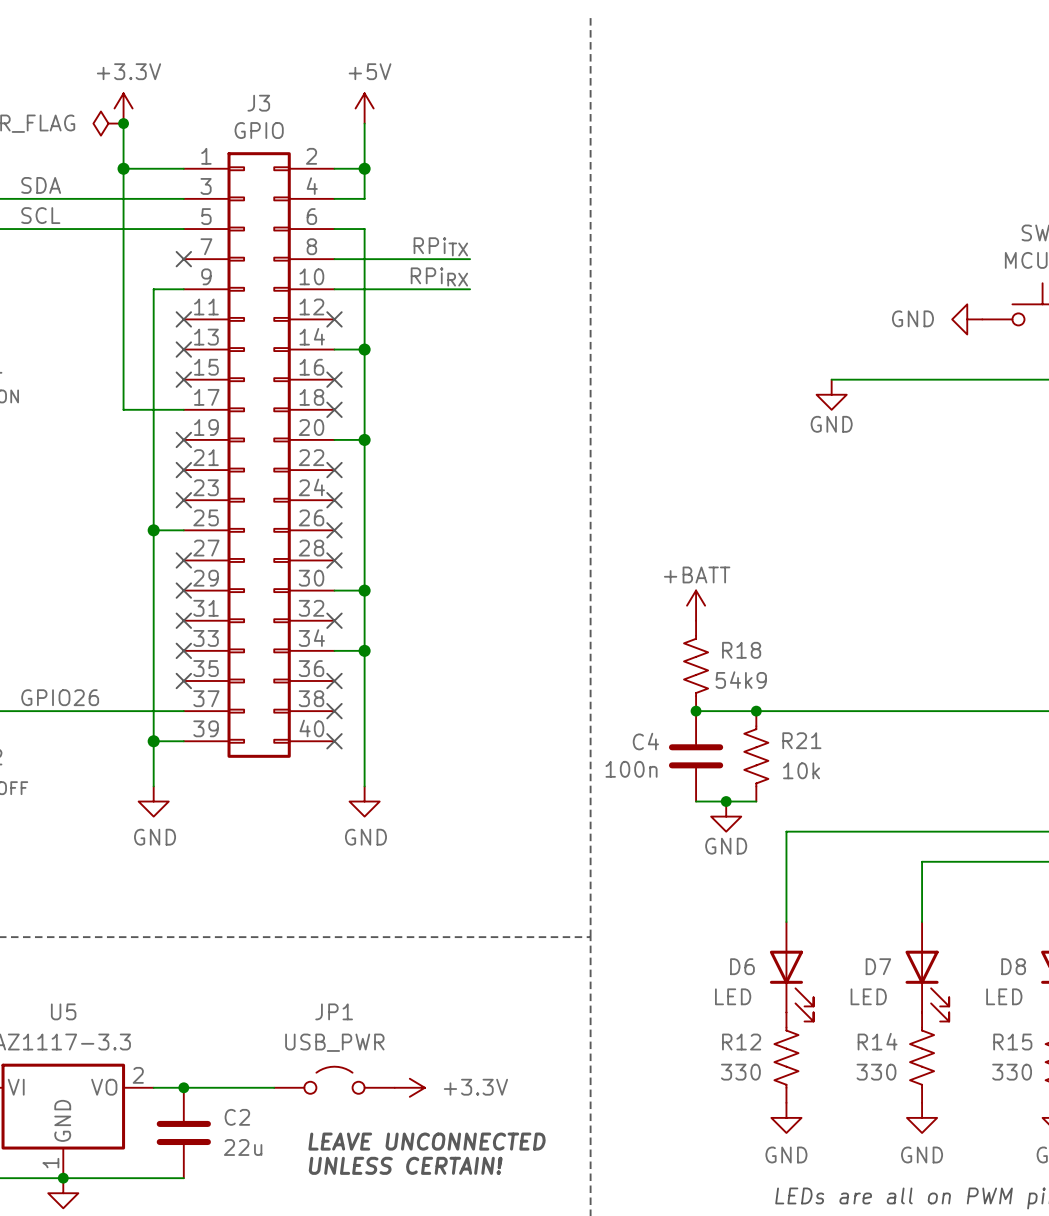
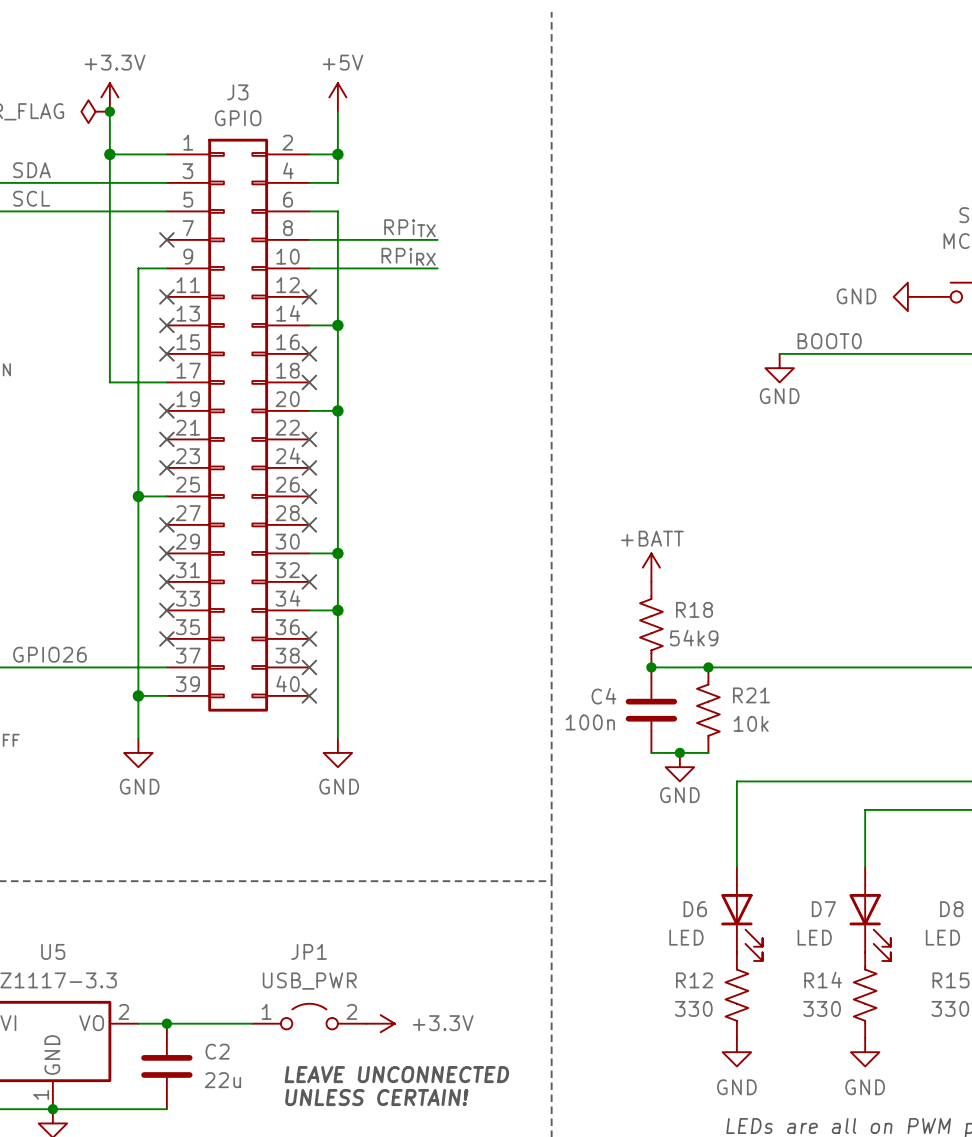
label: none -> BOOT0 (829, 341)
JP1 pin number: none -> 1 (266, 1011)
JP1 pin number: none -> 2 (351, 1011)

